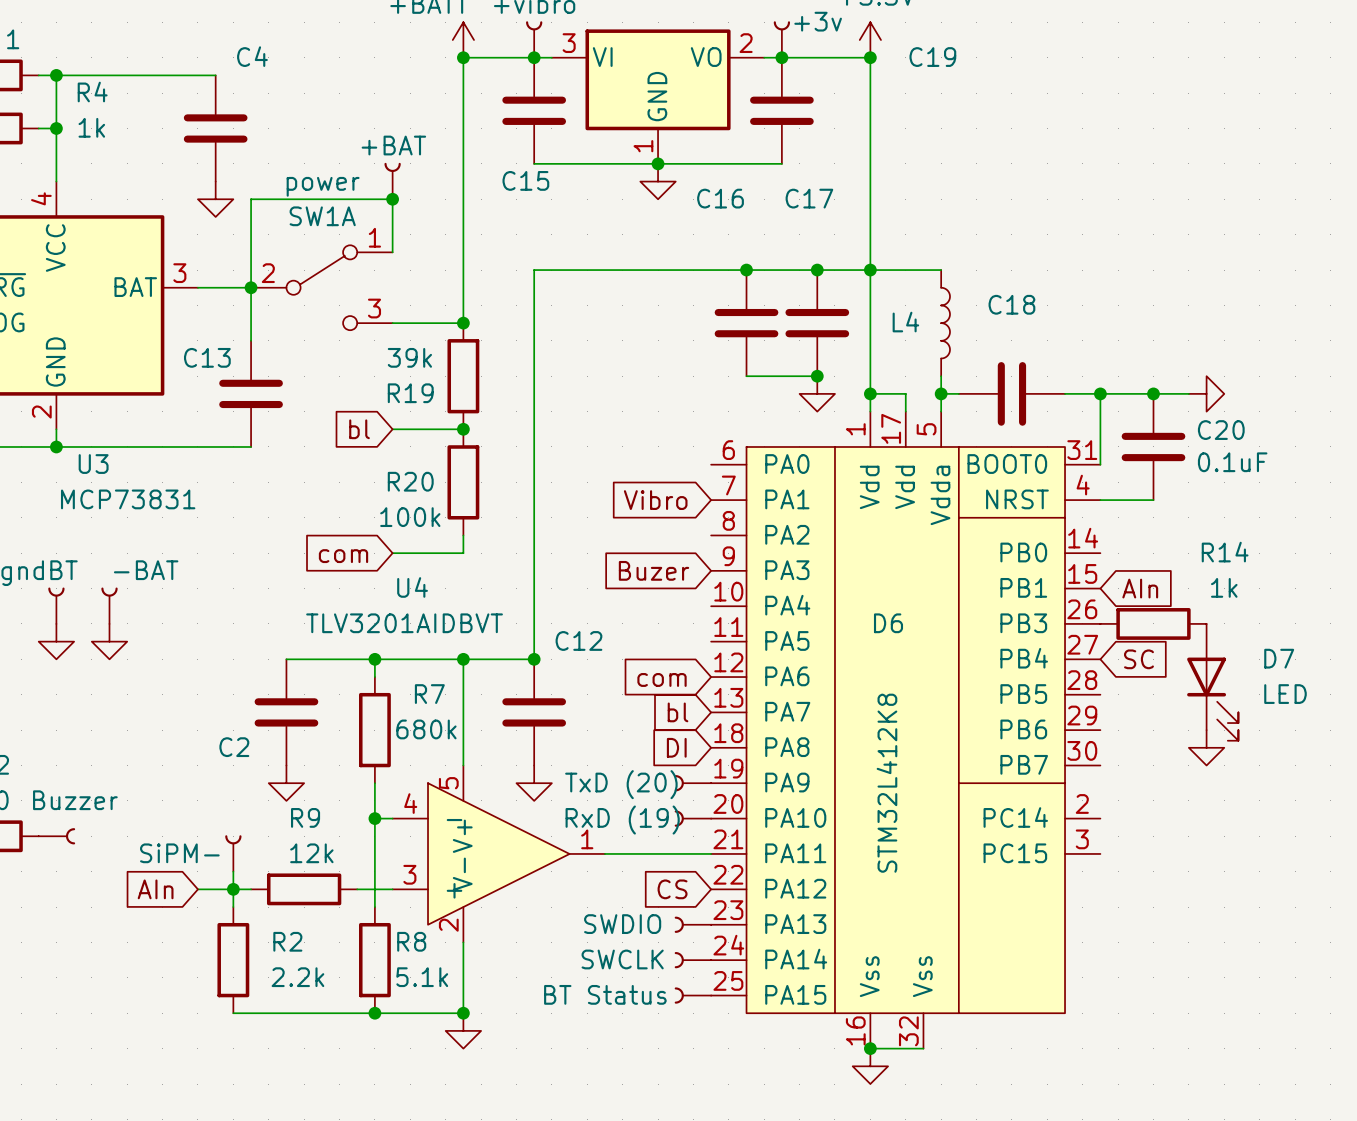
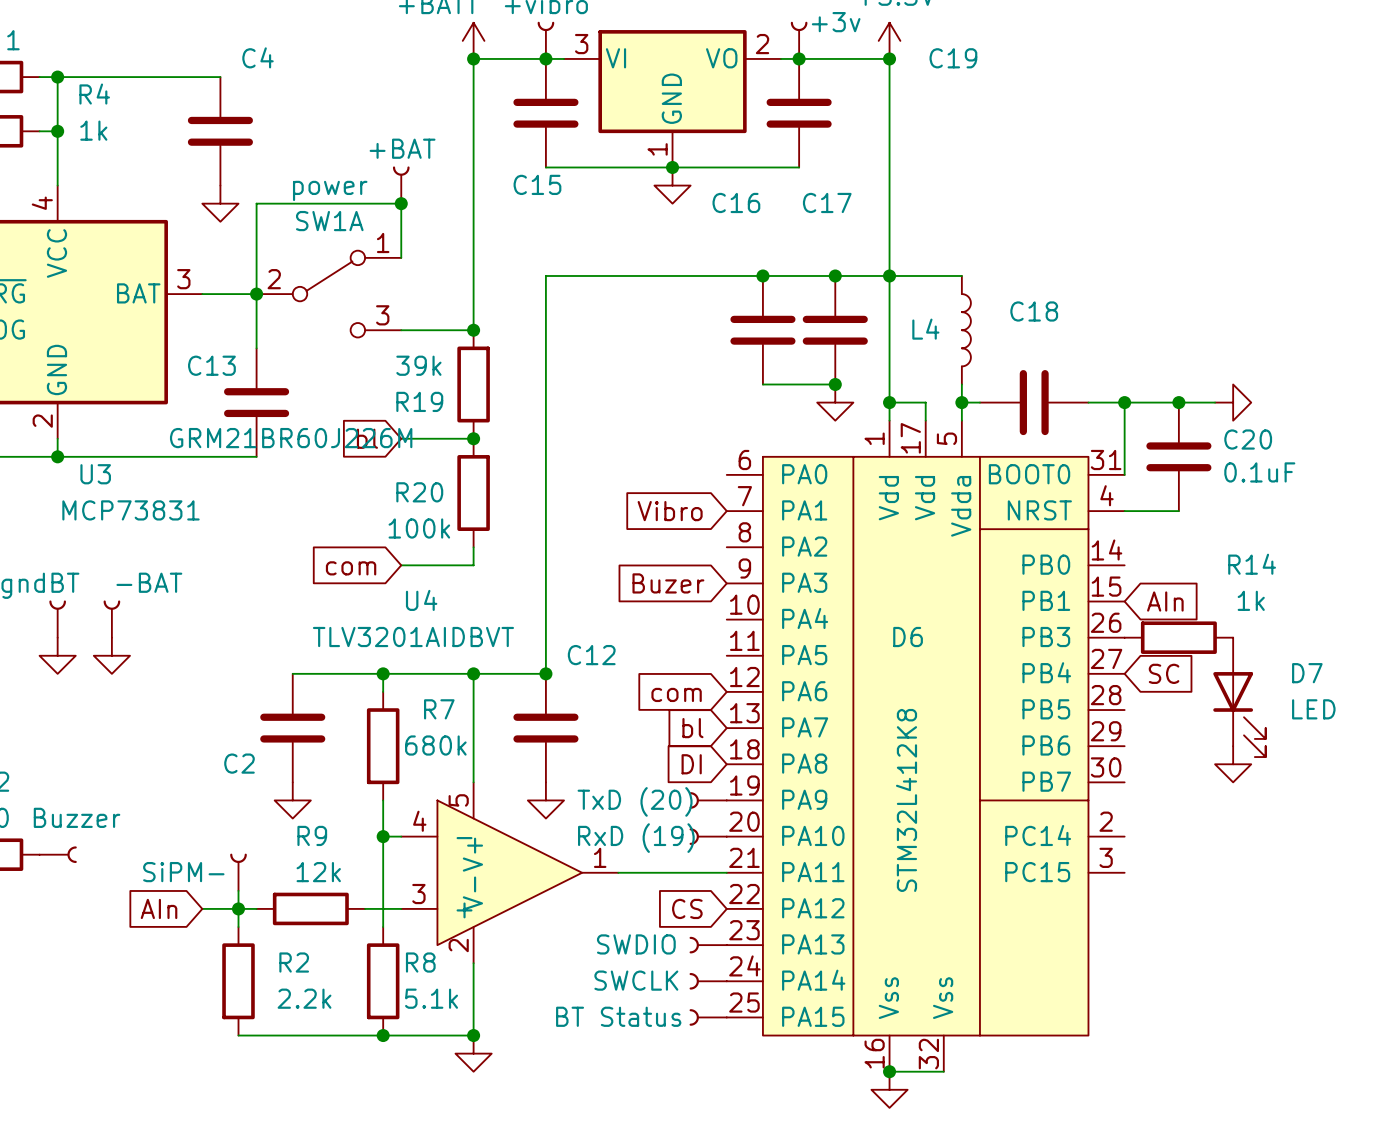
C13 value: none -> GRM21BR60J226M (291, 438)

